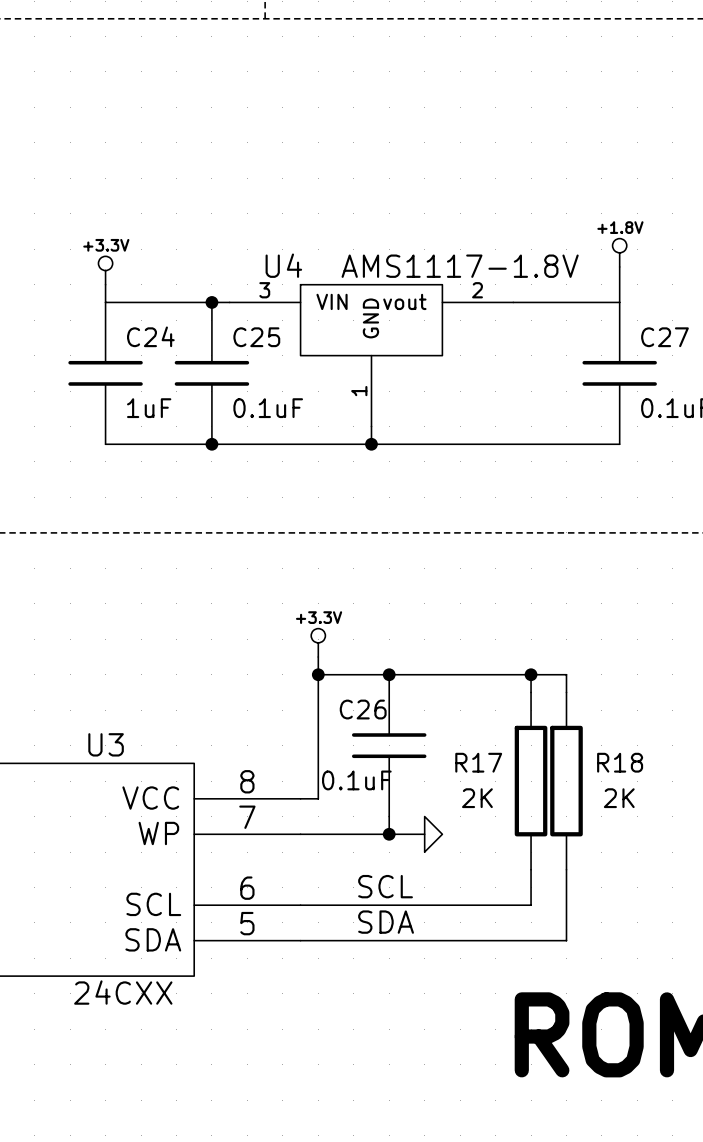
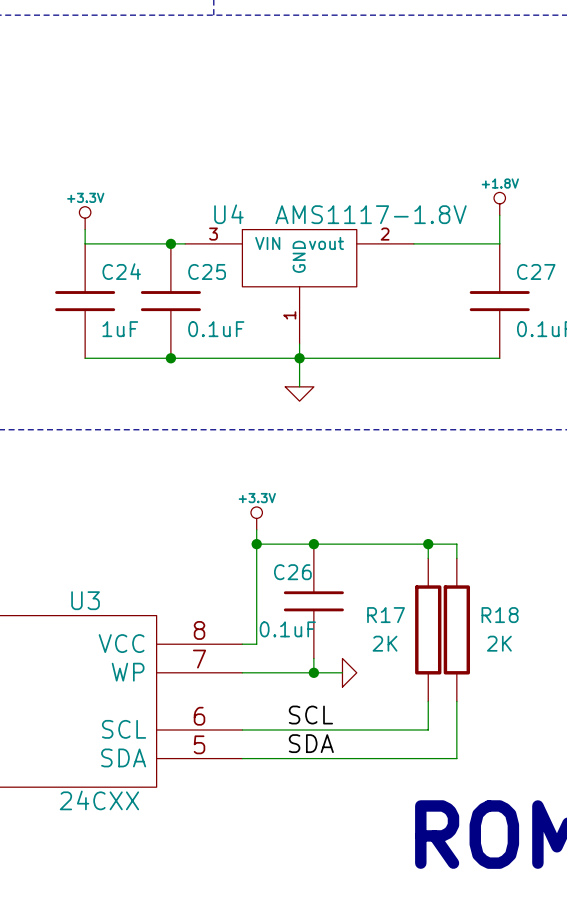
wire: none -> (299, 358) (299, 386)
power symbol: none -> (299, 394)

